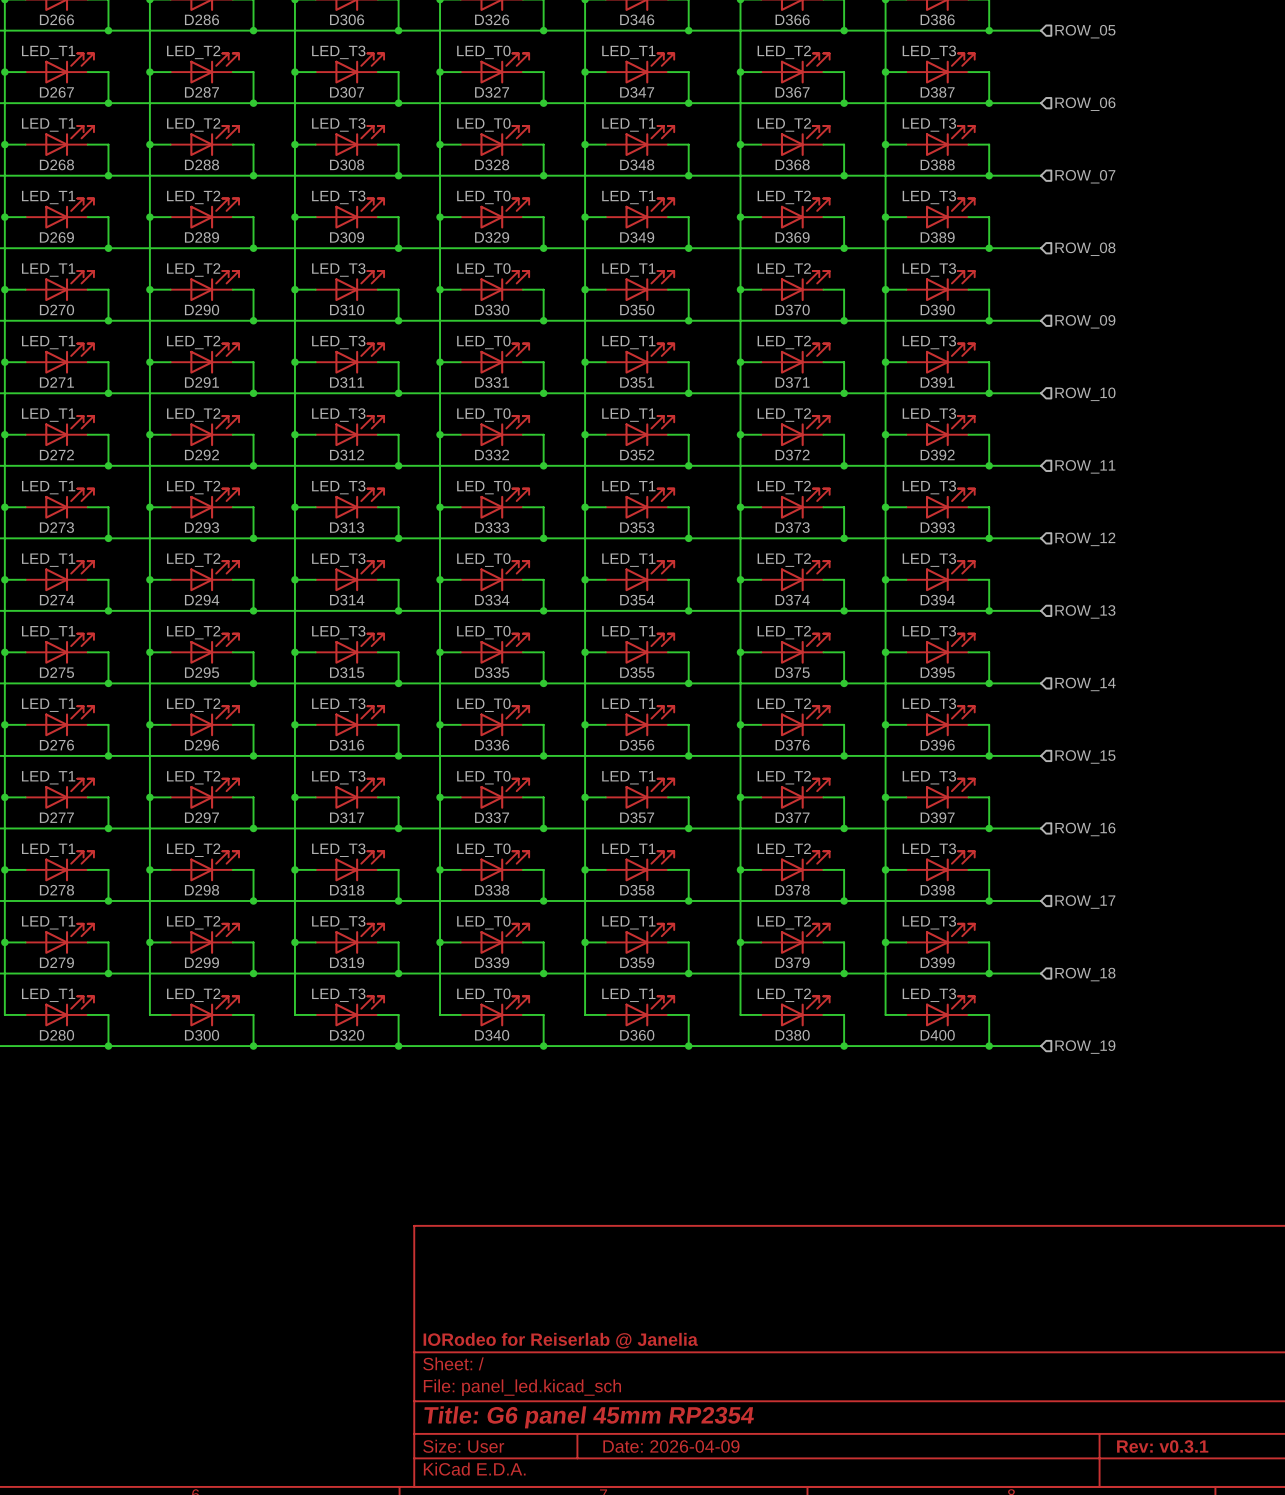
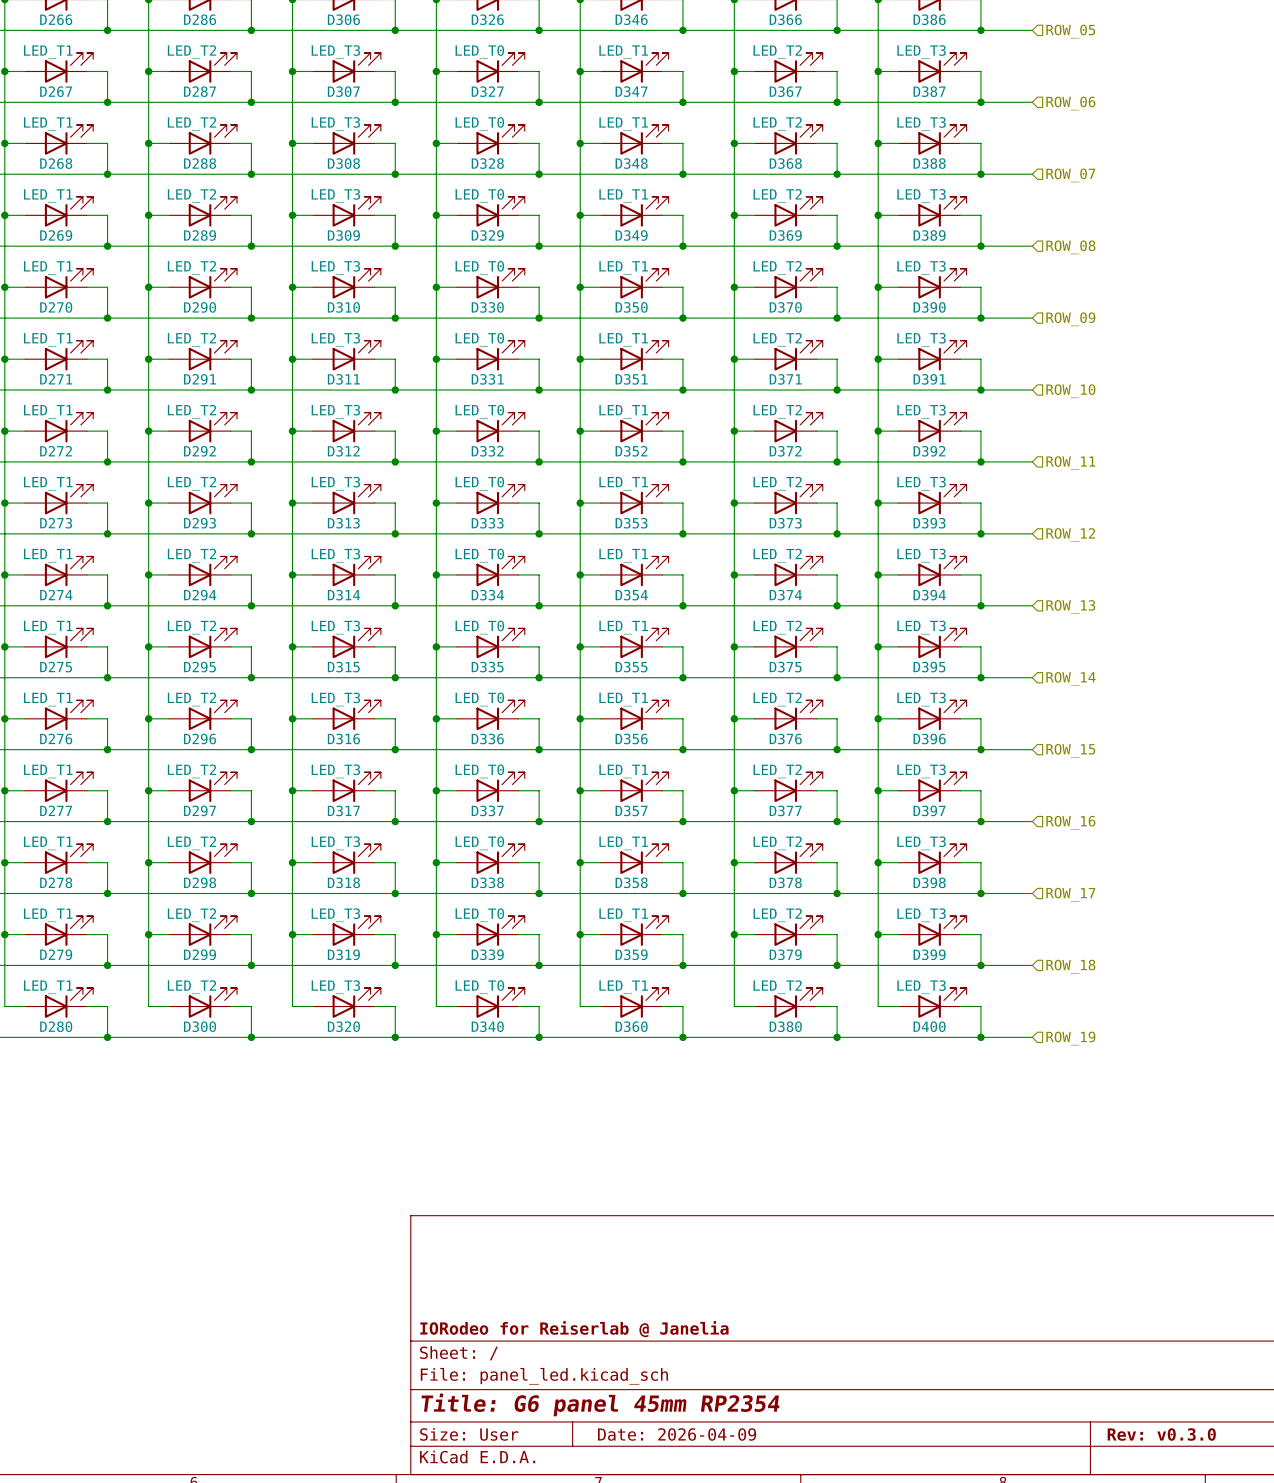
title block: Rev: v0.3.1 (1162, 1446) -> Rev: v0.3.0 (1161, 1434)

